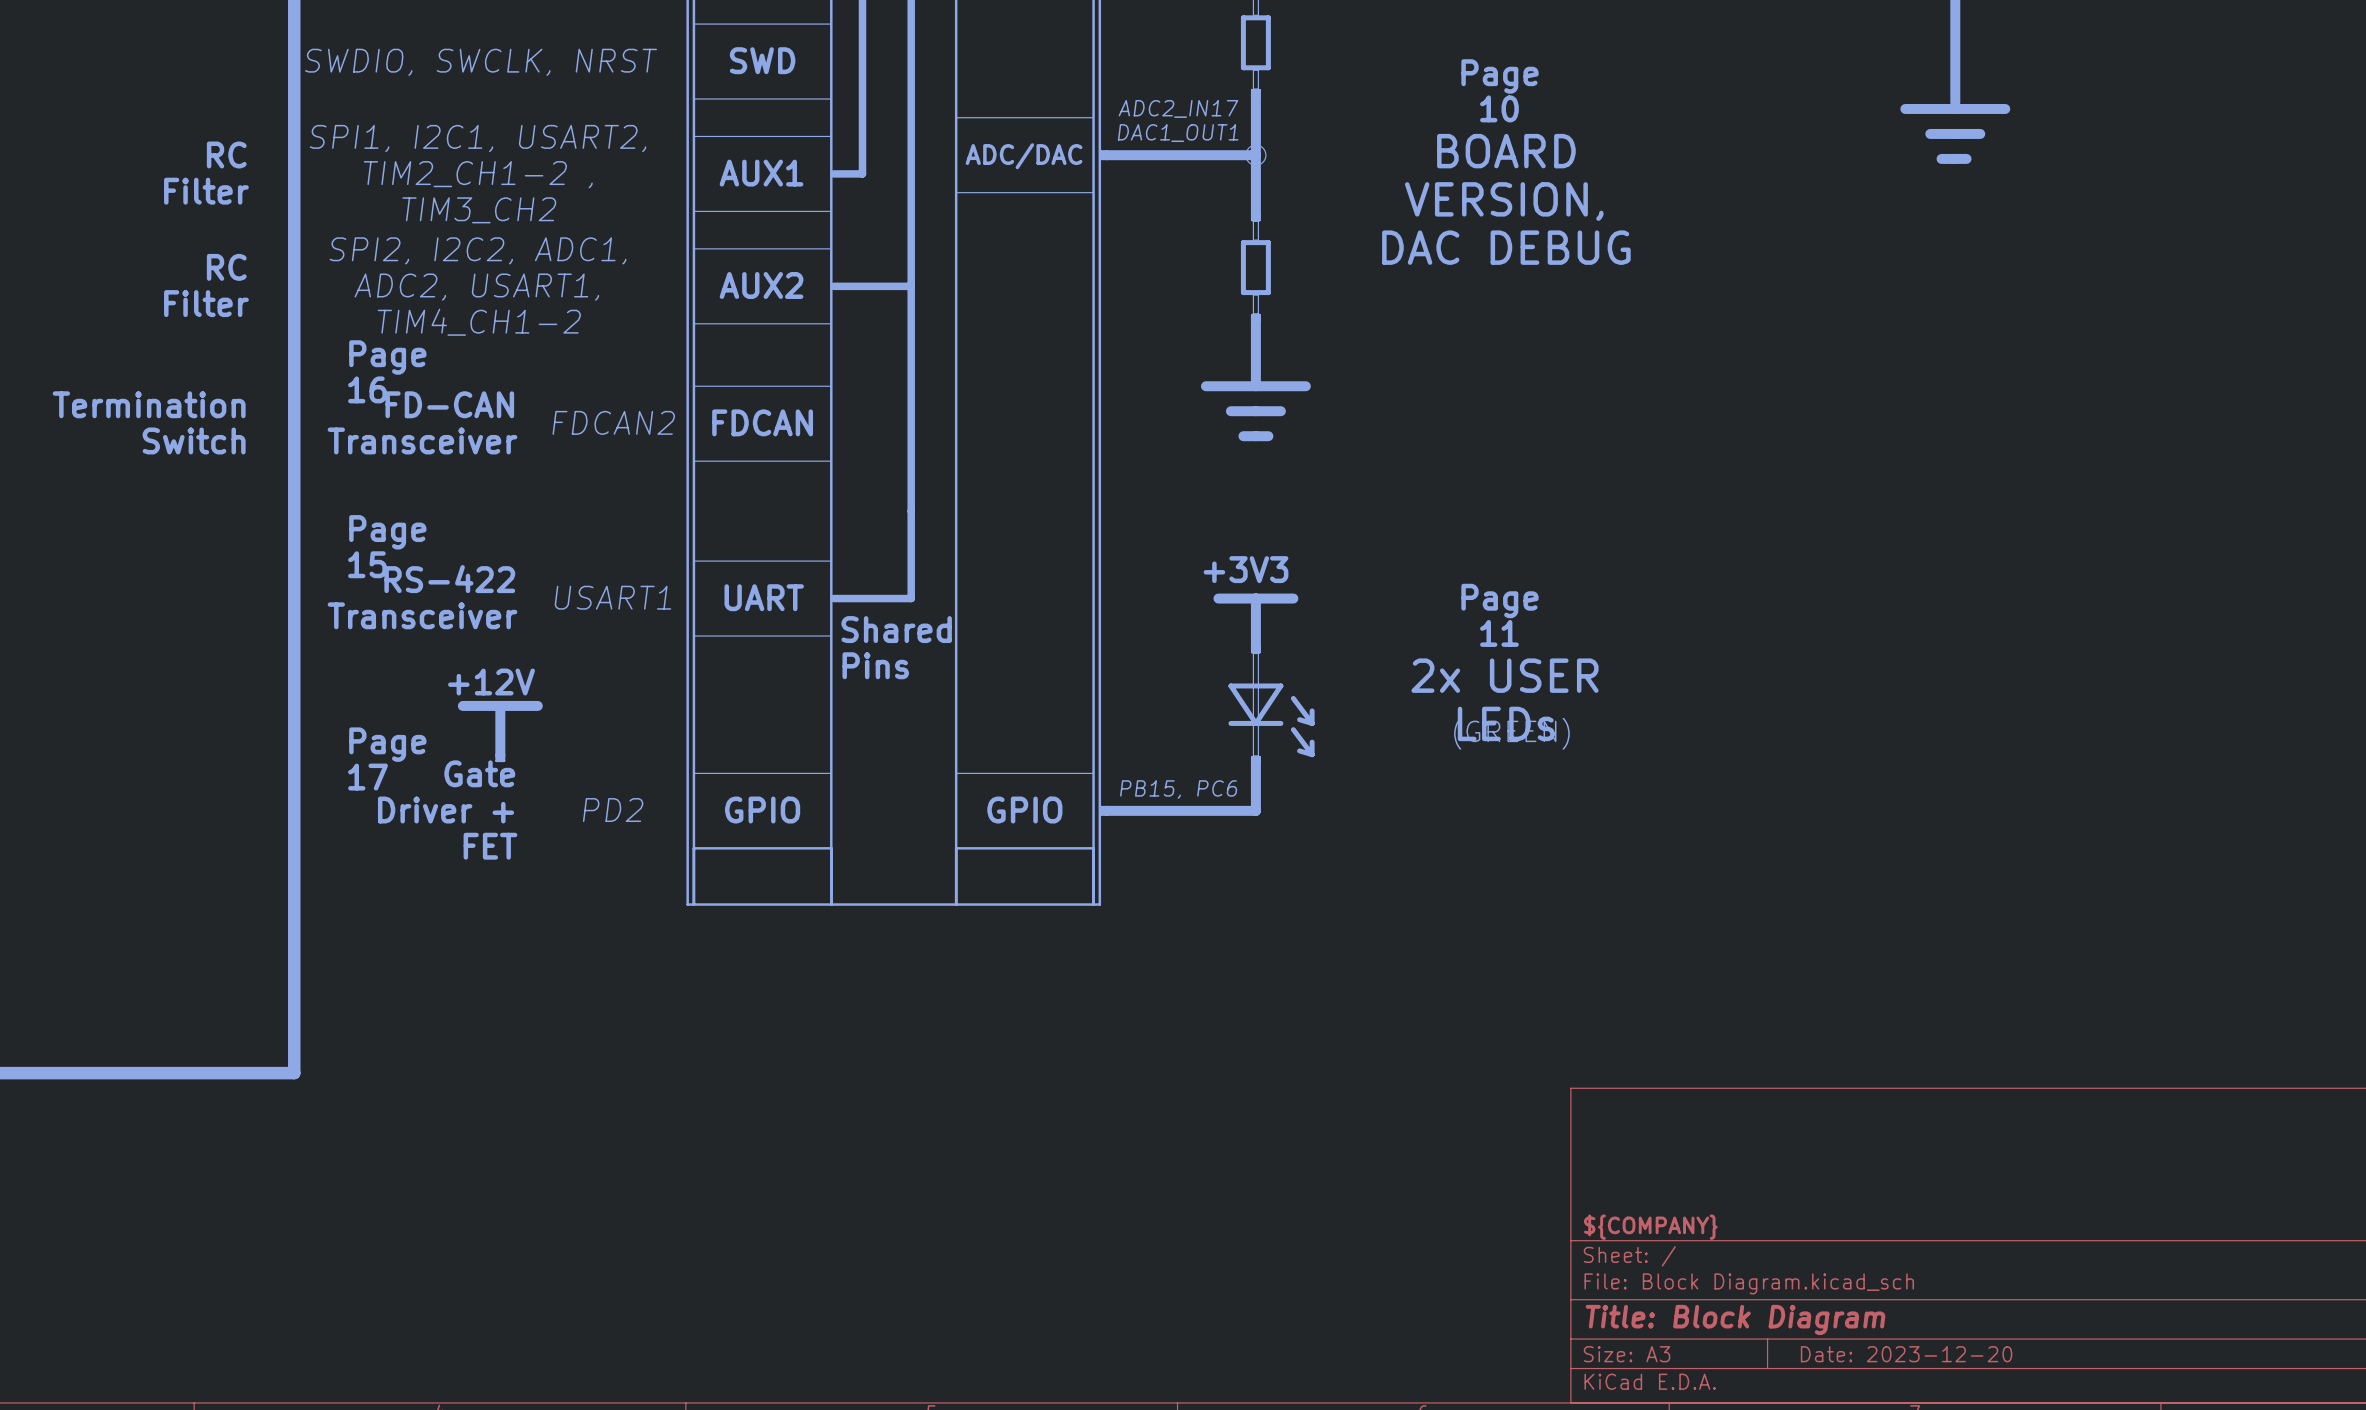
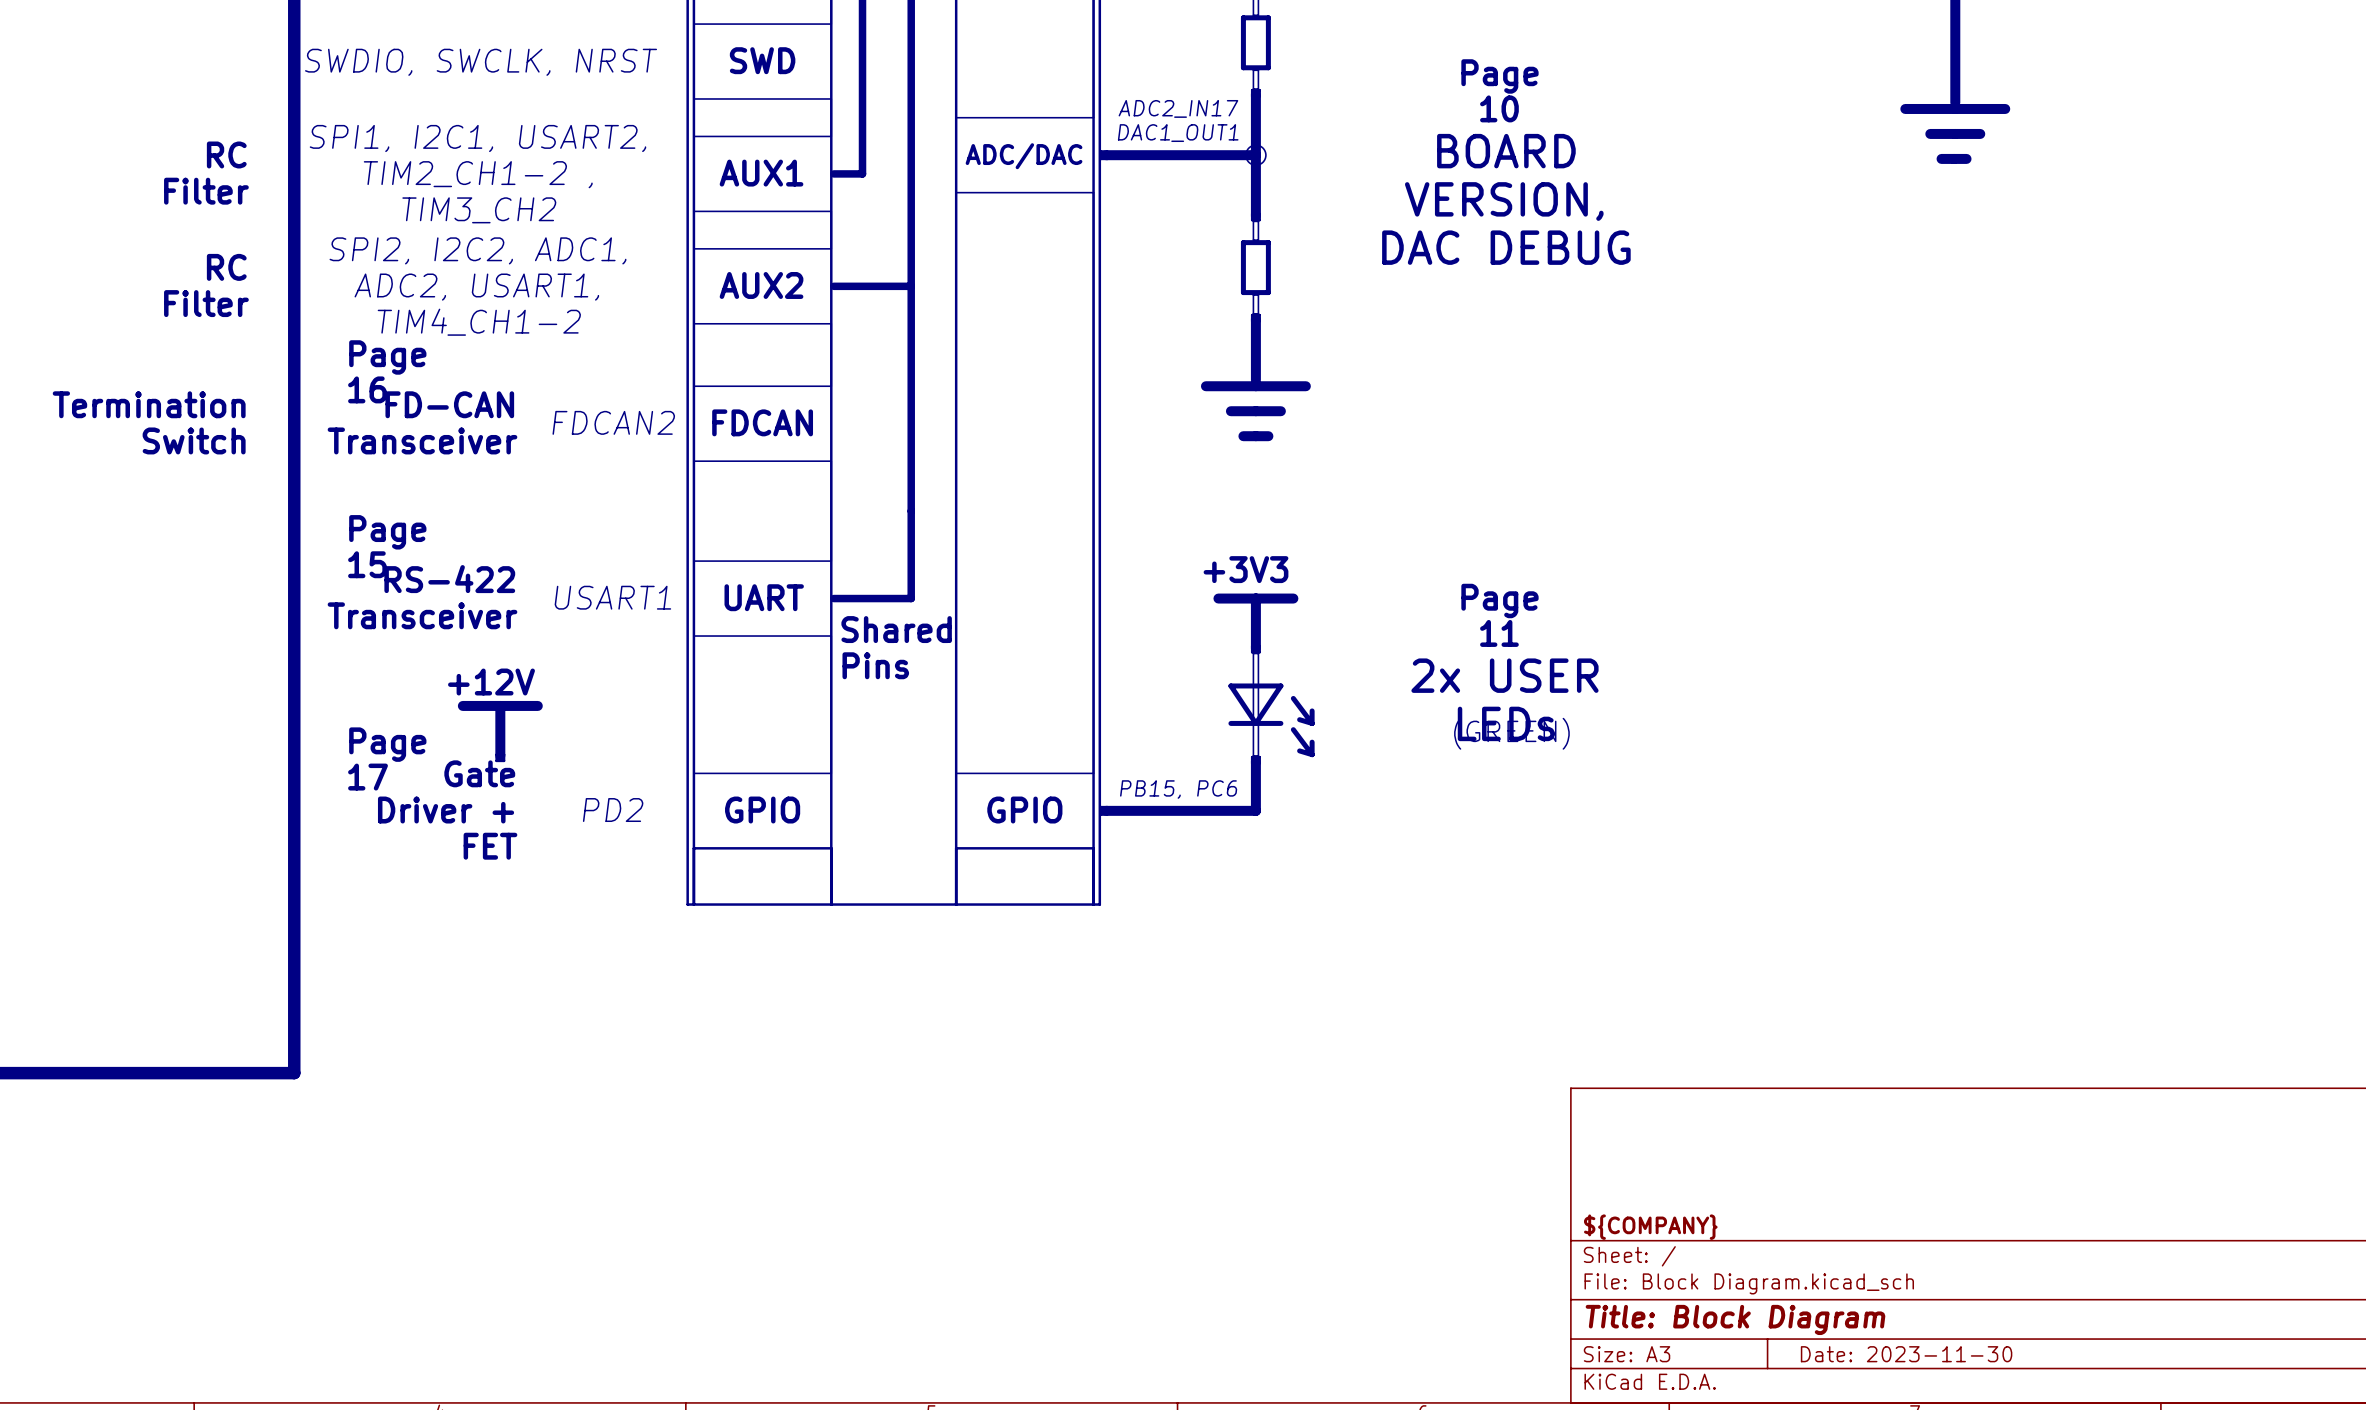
title block: Date: 2023-12-20 (1906, 1354) -> Date: 2023-11-30 (1906, 1354)

